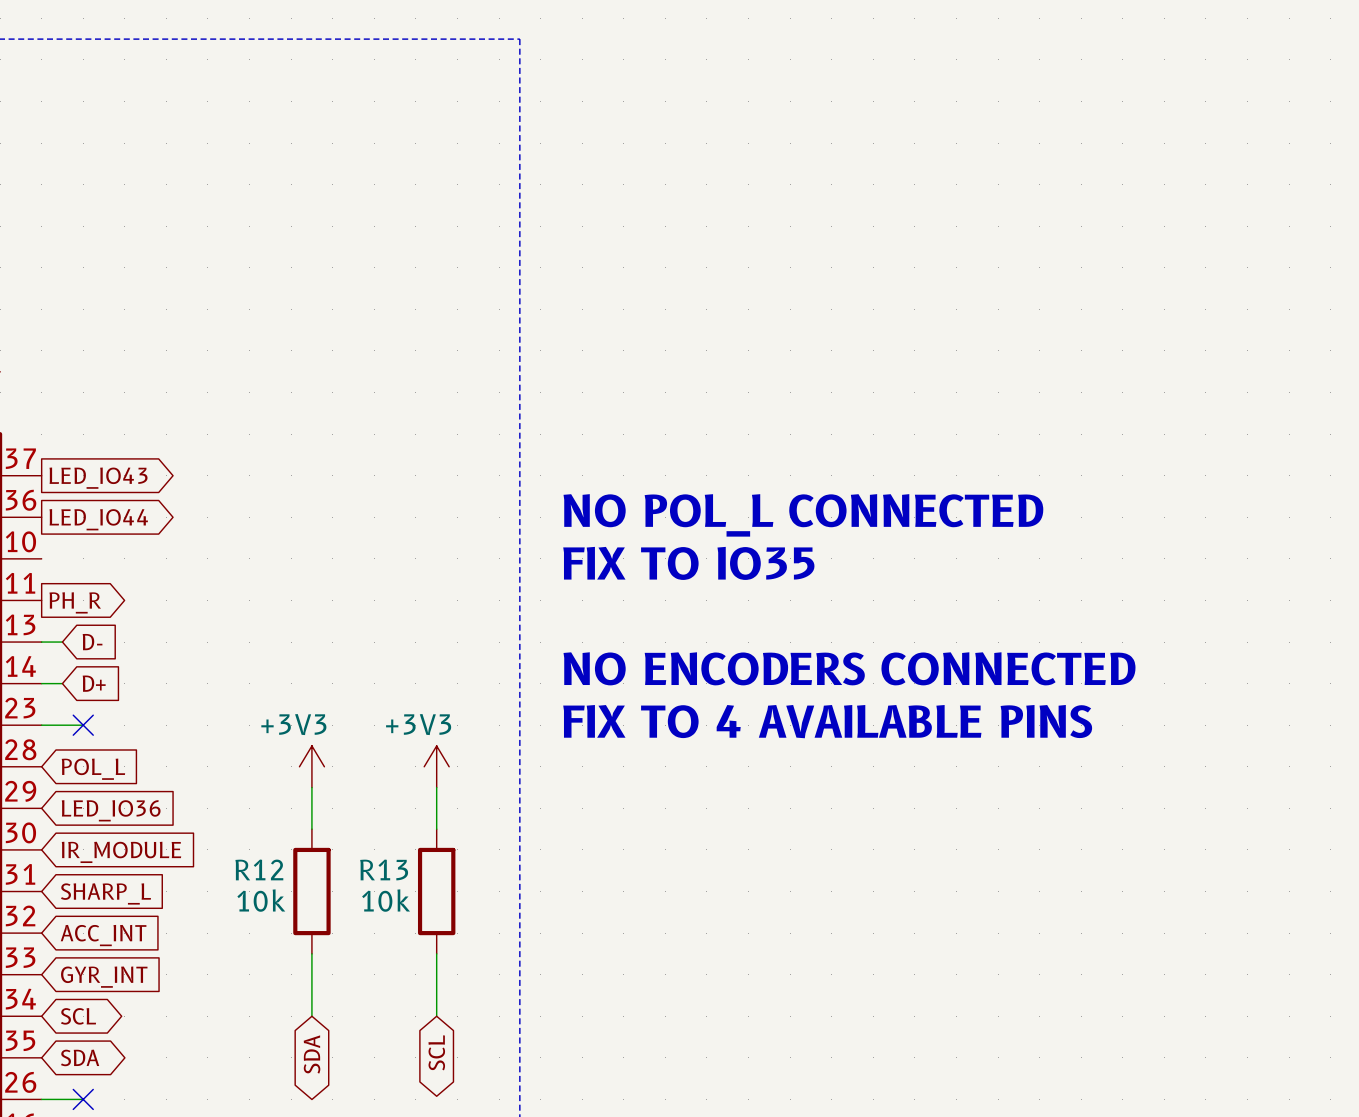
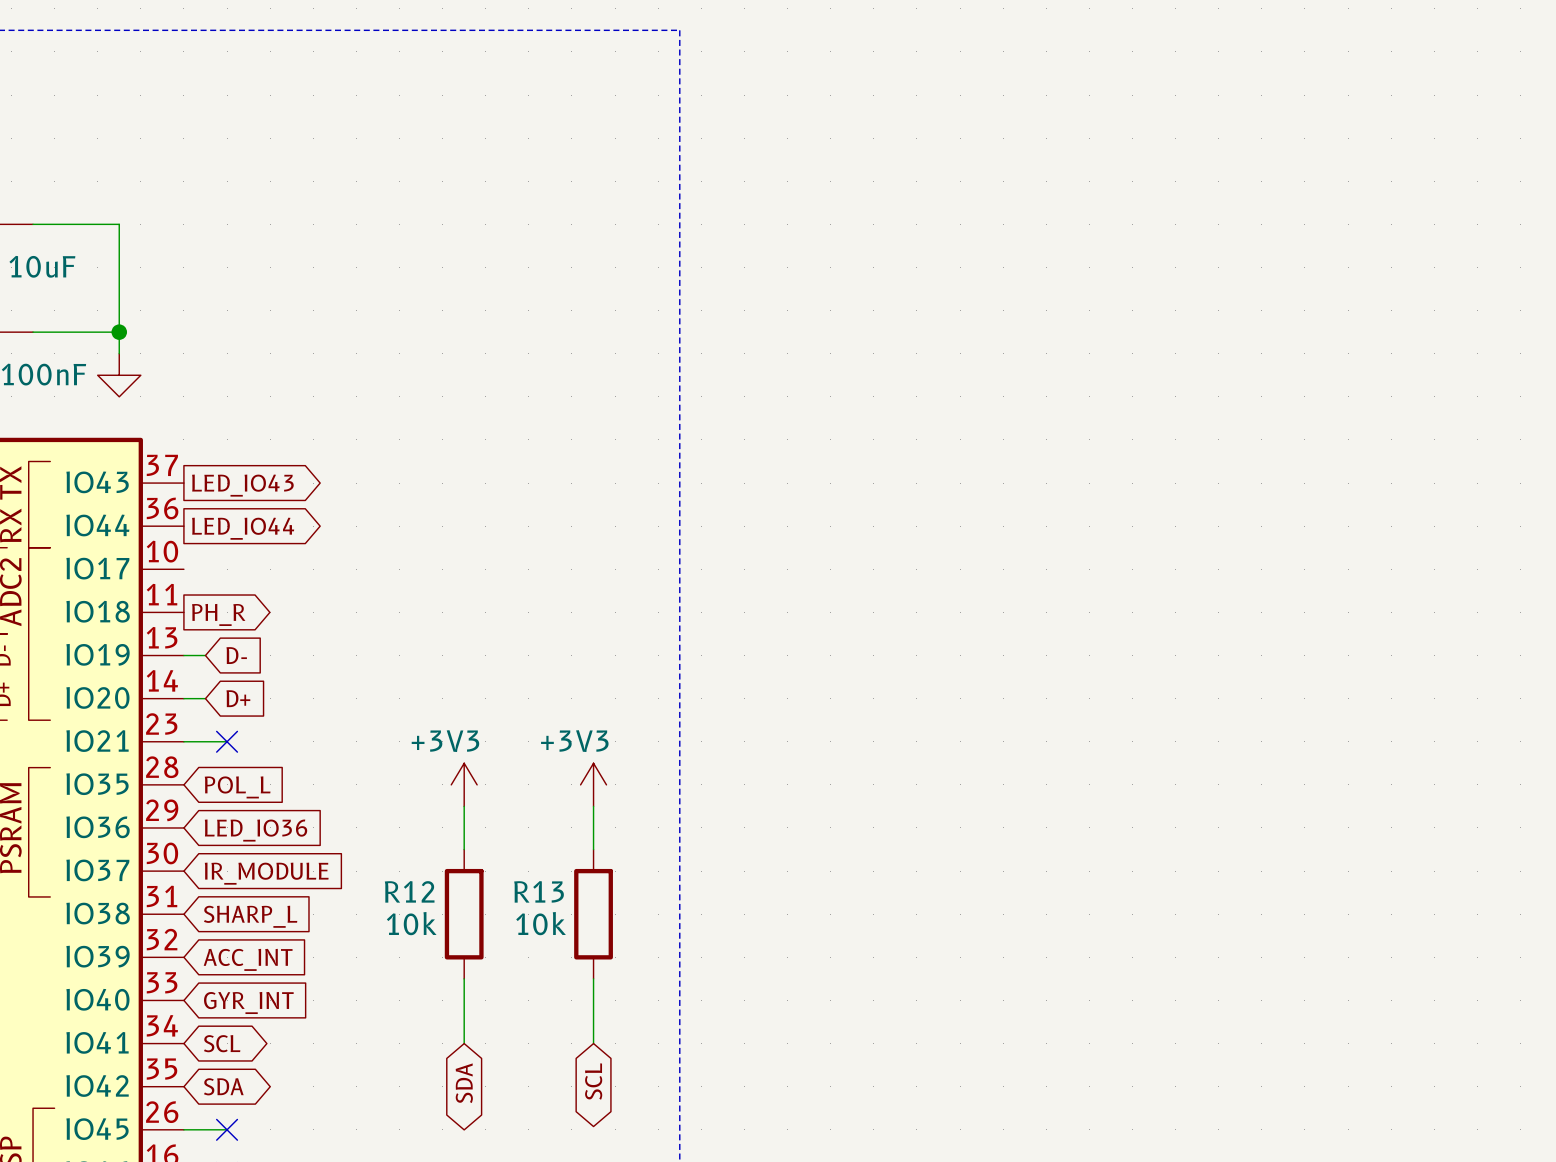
text: NO POL_L CONNECTED (803, 515) -> none
text: FIX TO IO35 (688, 563) -> none
text: NO ENCODERS CONNECTED (849, 668) -> none
text: FIX TO 4 AVAILABLE PINS (827, 721) -> none

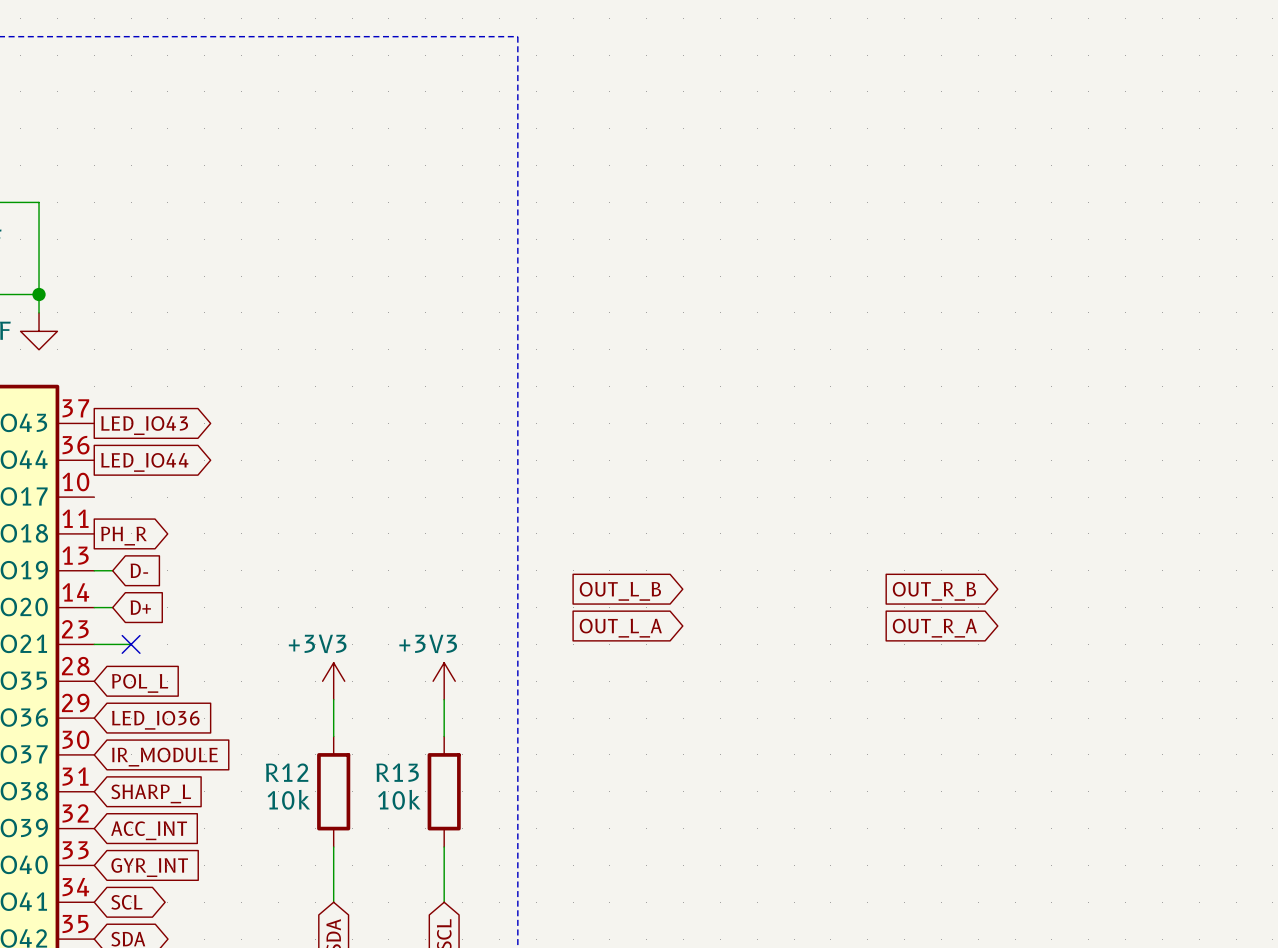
global label: none -> OUT_L_B (620, 591)
global label: none -> OUT_R_B (934, 591)
global label: none -> OUT_L_A (620, 628)
global label: none -> OUT_R_A (934, 628)

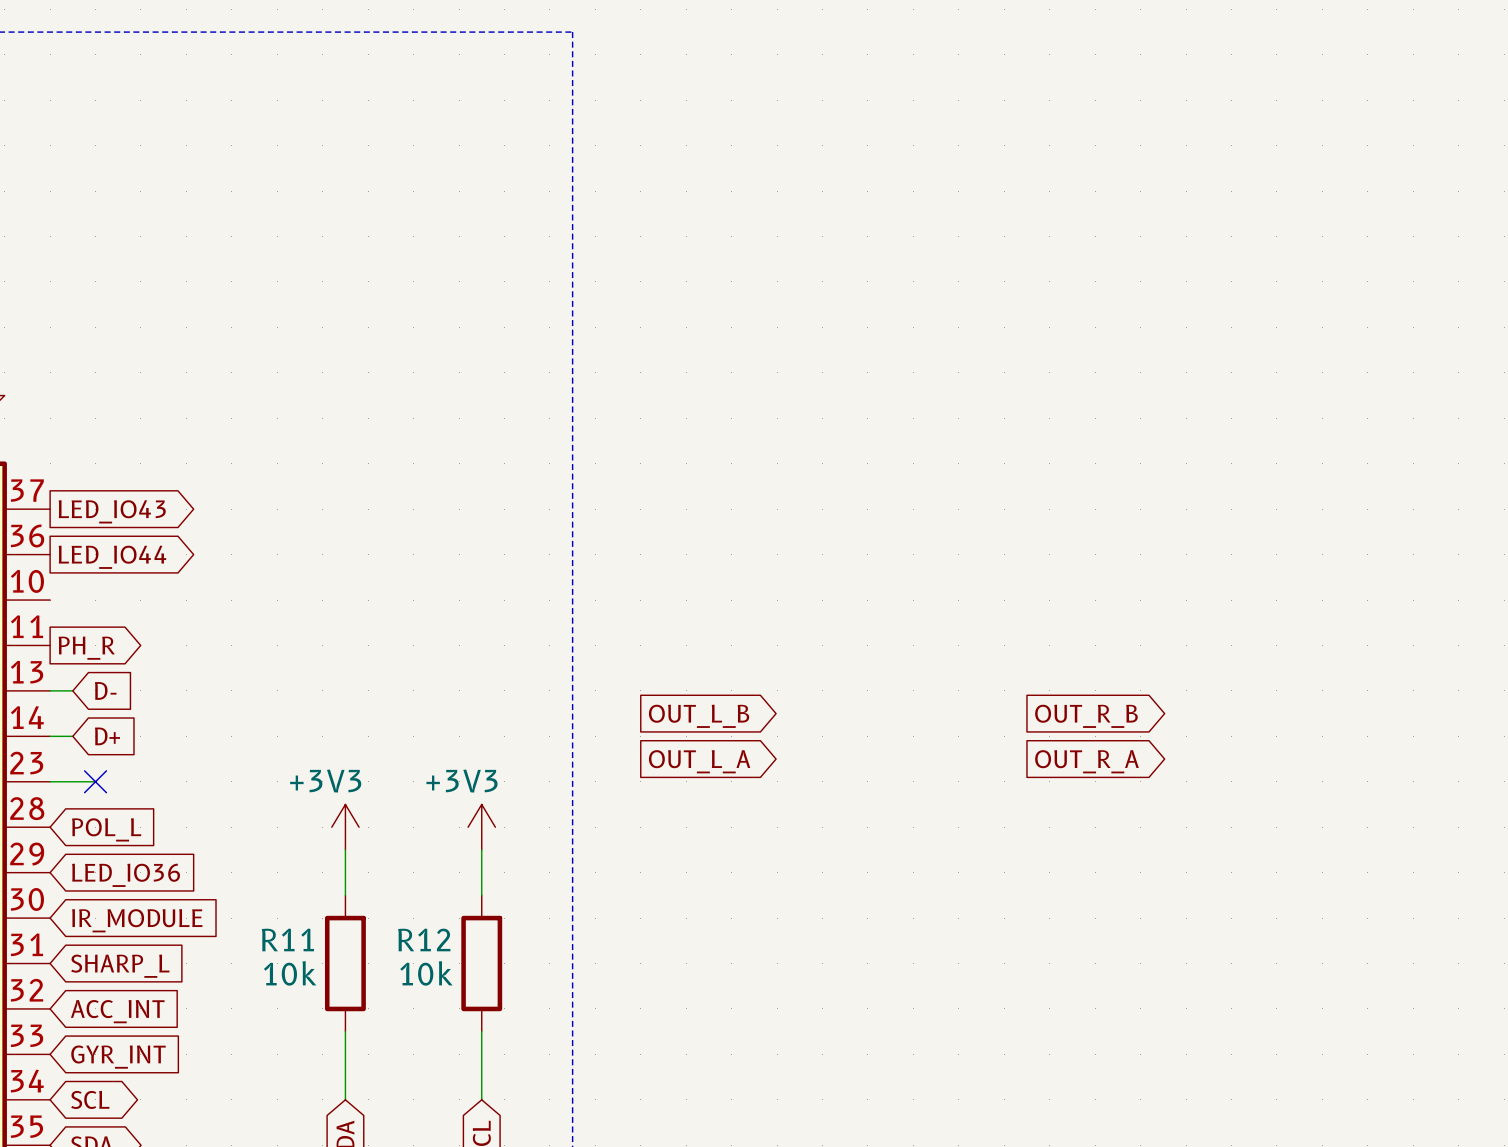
R12 name: R12 (287, 772) -> R11 (287, 939)
R13 name: R13 (397, 772) -> R12 (424, 939)

